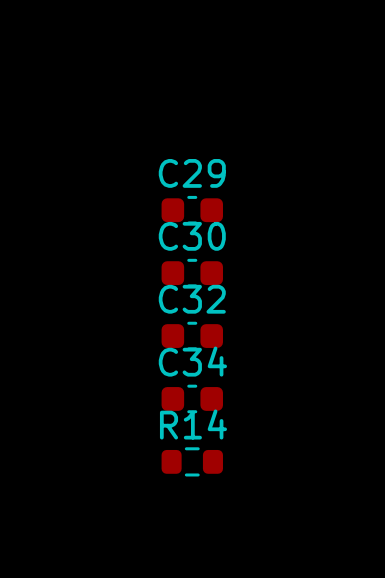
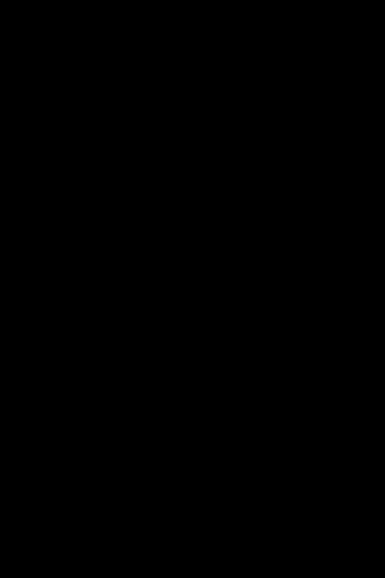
C29: (192, 210) -> none
C30: (192, 273) -> none
C32: (192, 336) -> none
C34: (192, 398) -> none
R14: (192, 461) -> none

